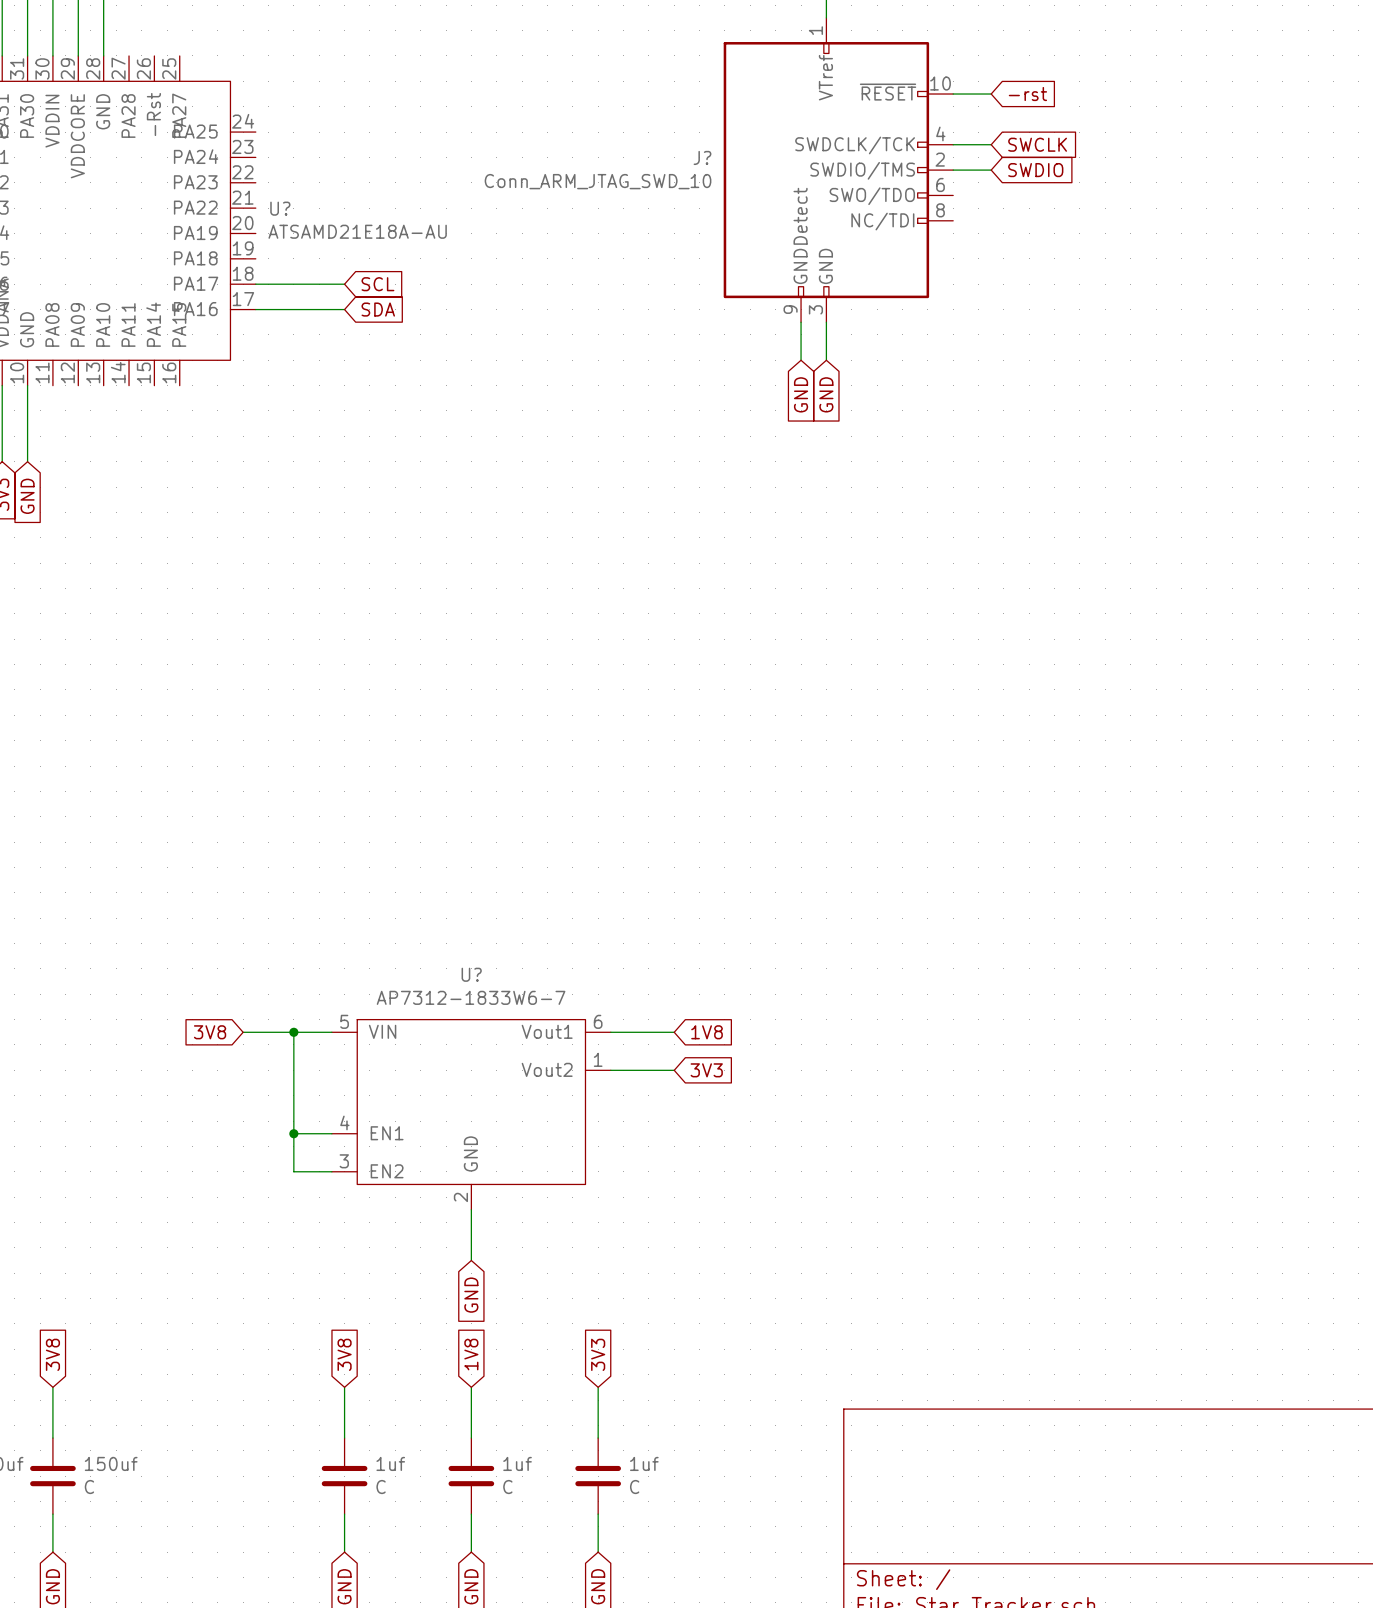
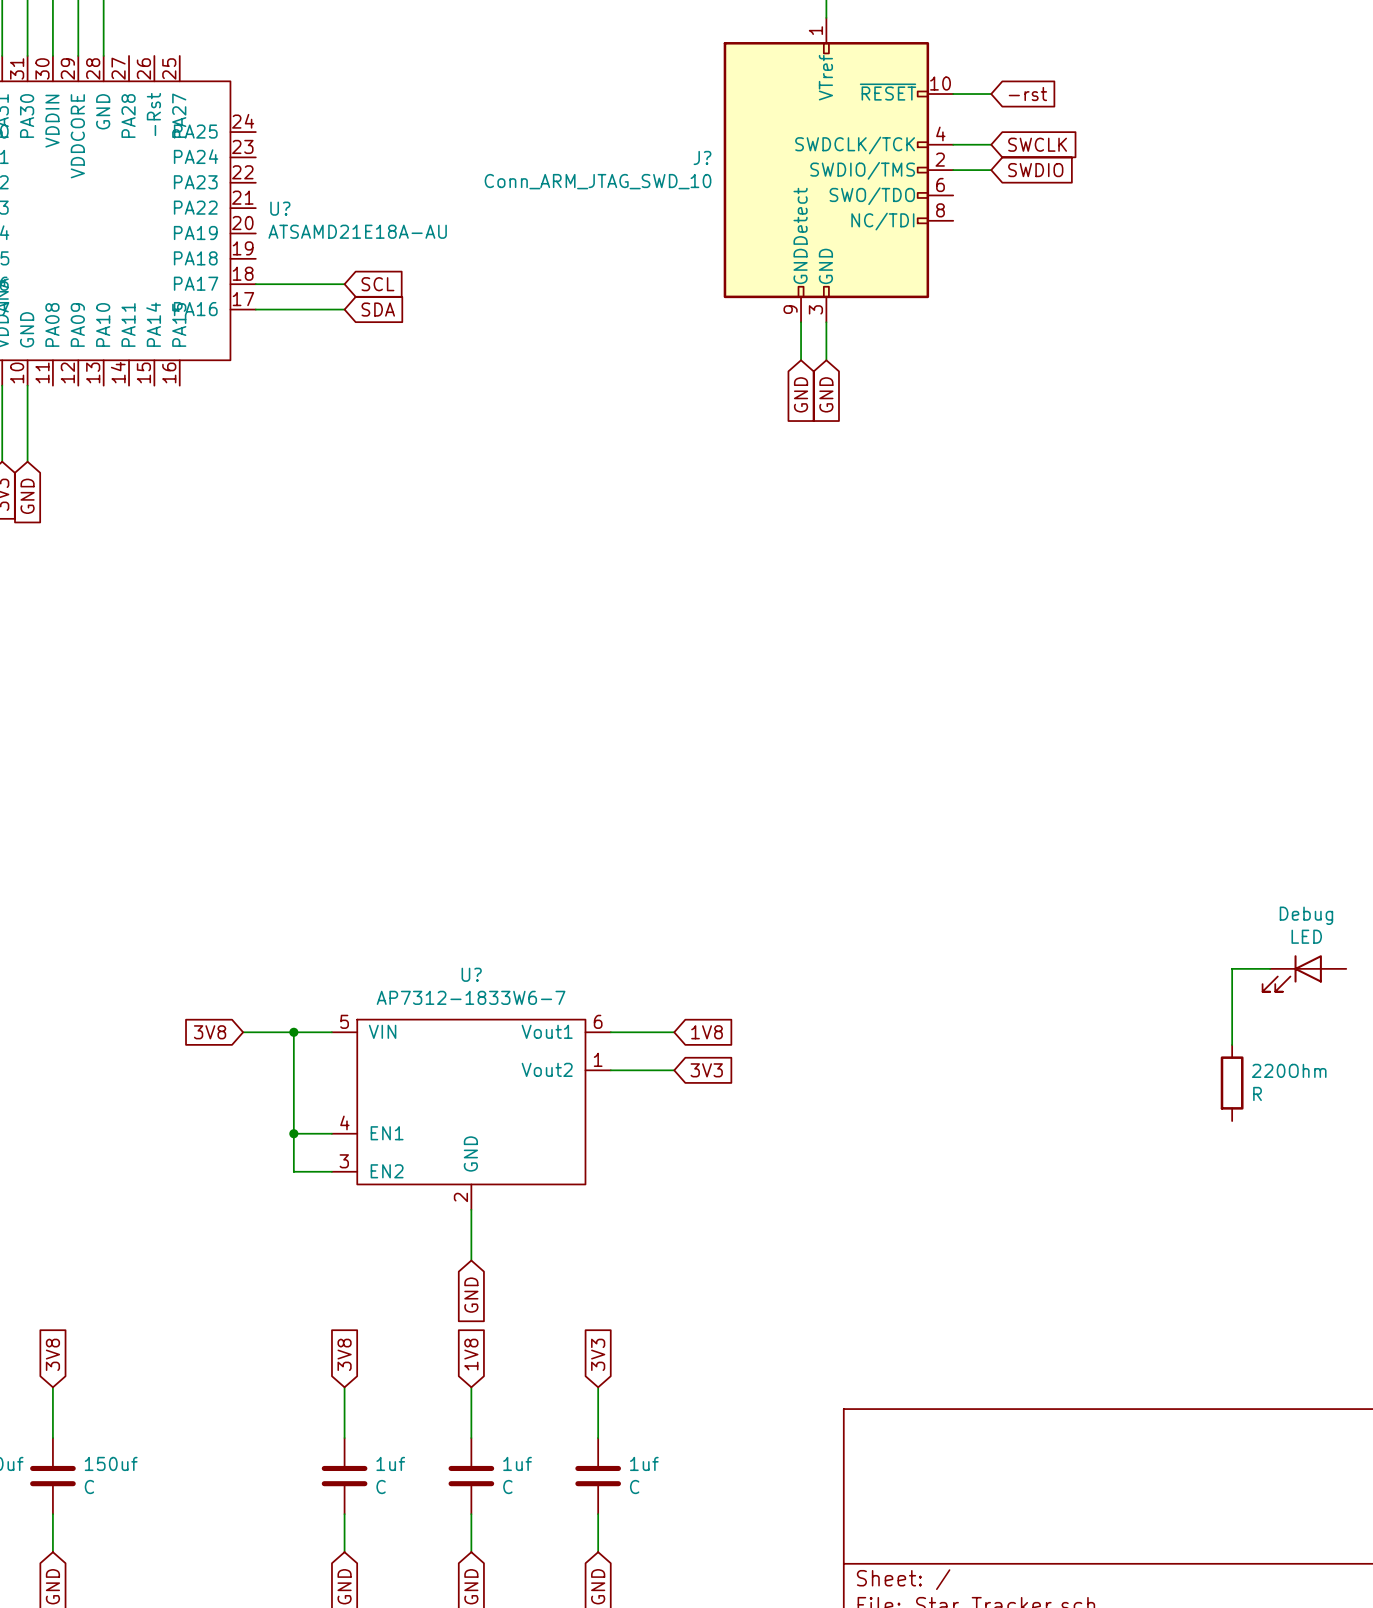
wire: none -> (1270, 968) (1232, 968) (1232, 1044)
Debug: none -> LED (1304, 973)
220Ohm: none -> R (1232, 1083)

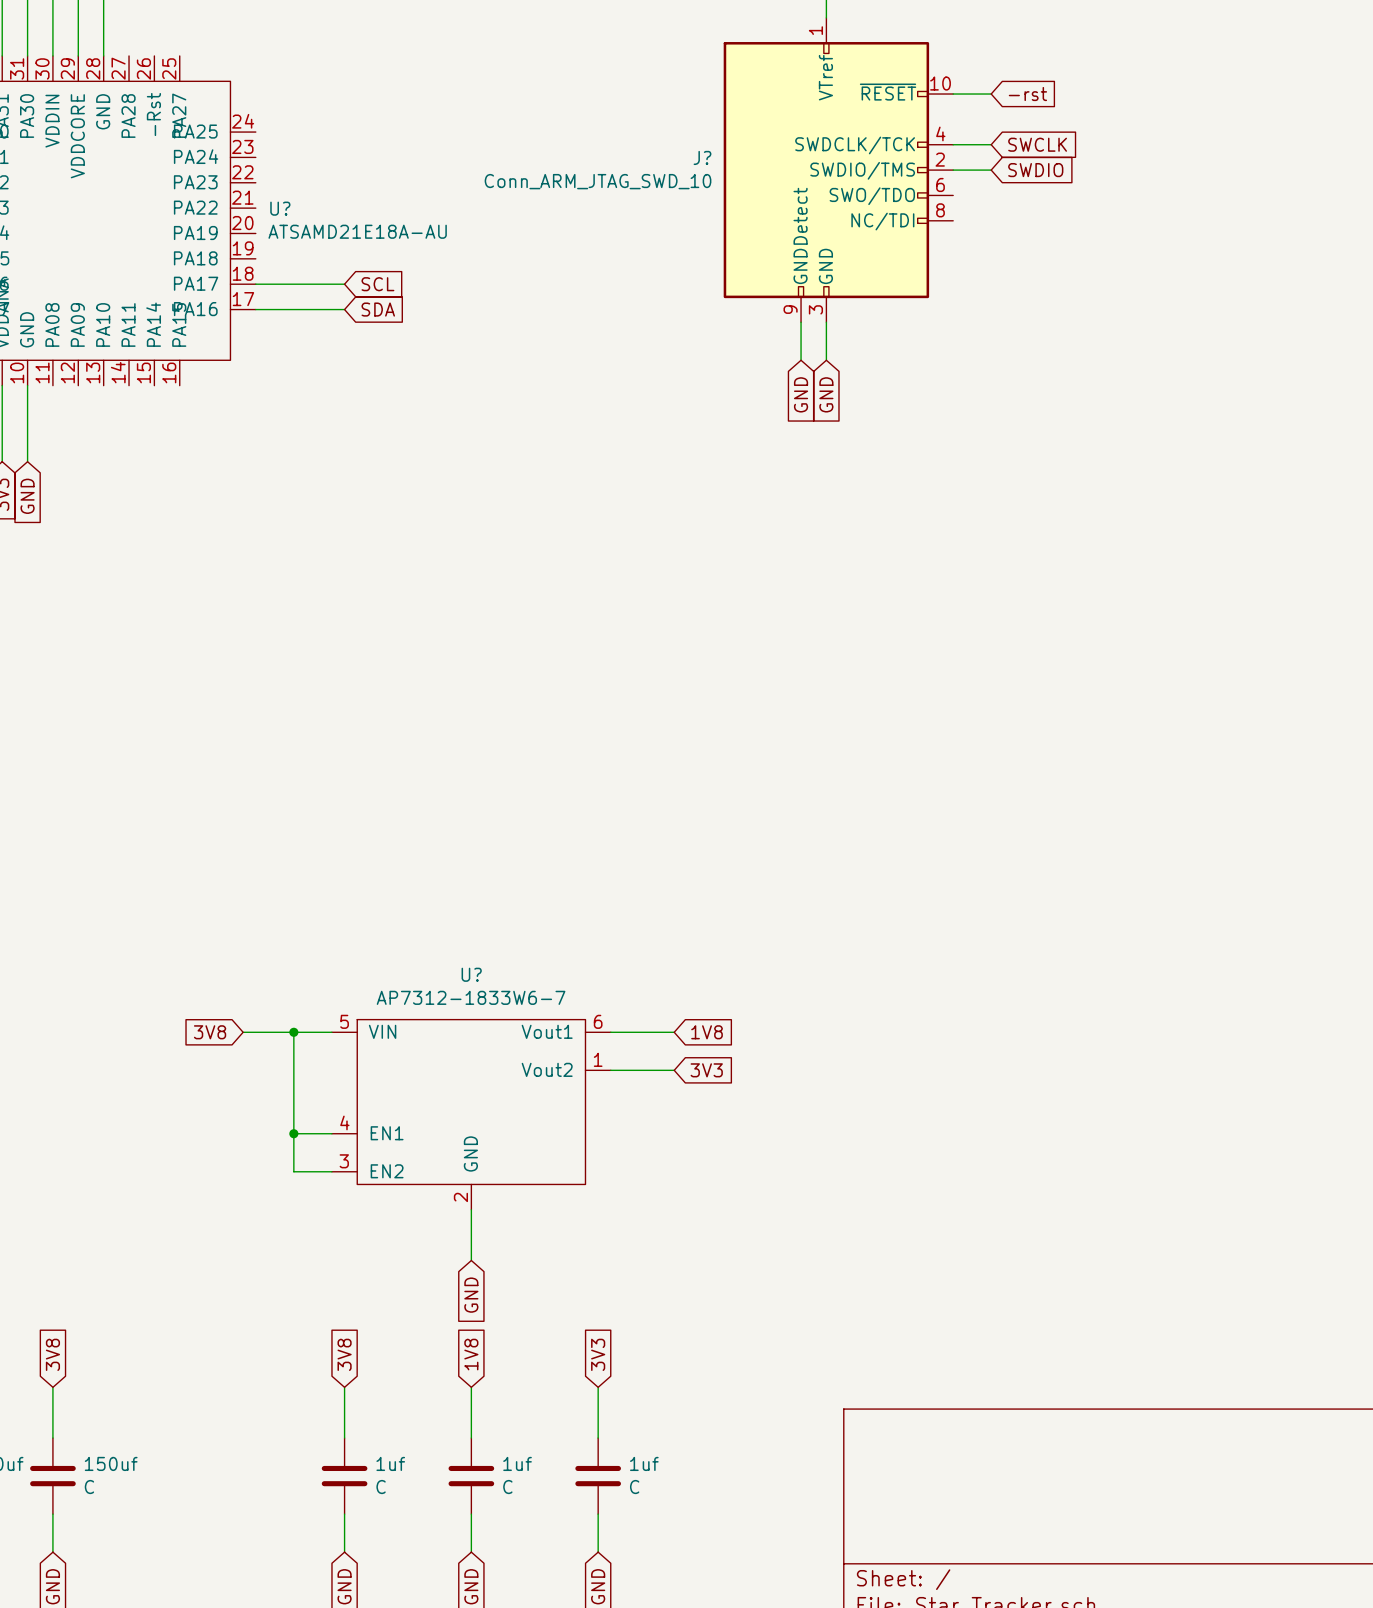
wire: (1270, 968) (1232, 968) (1232, 1044) -> none
Debug: LED (1304, 973) -> none
220Ohm: R (1232, 1083) -> none

